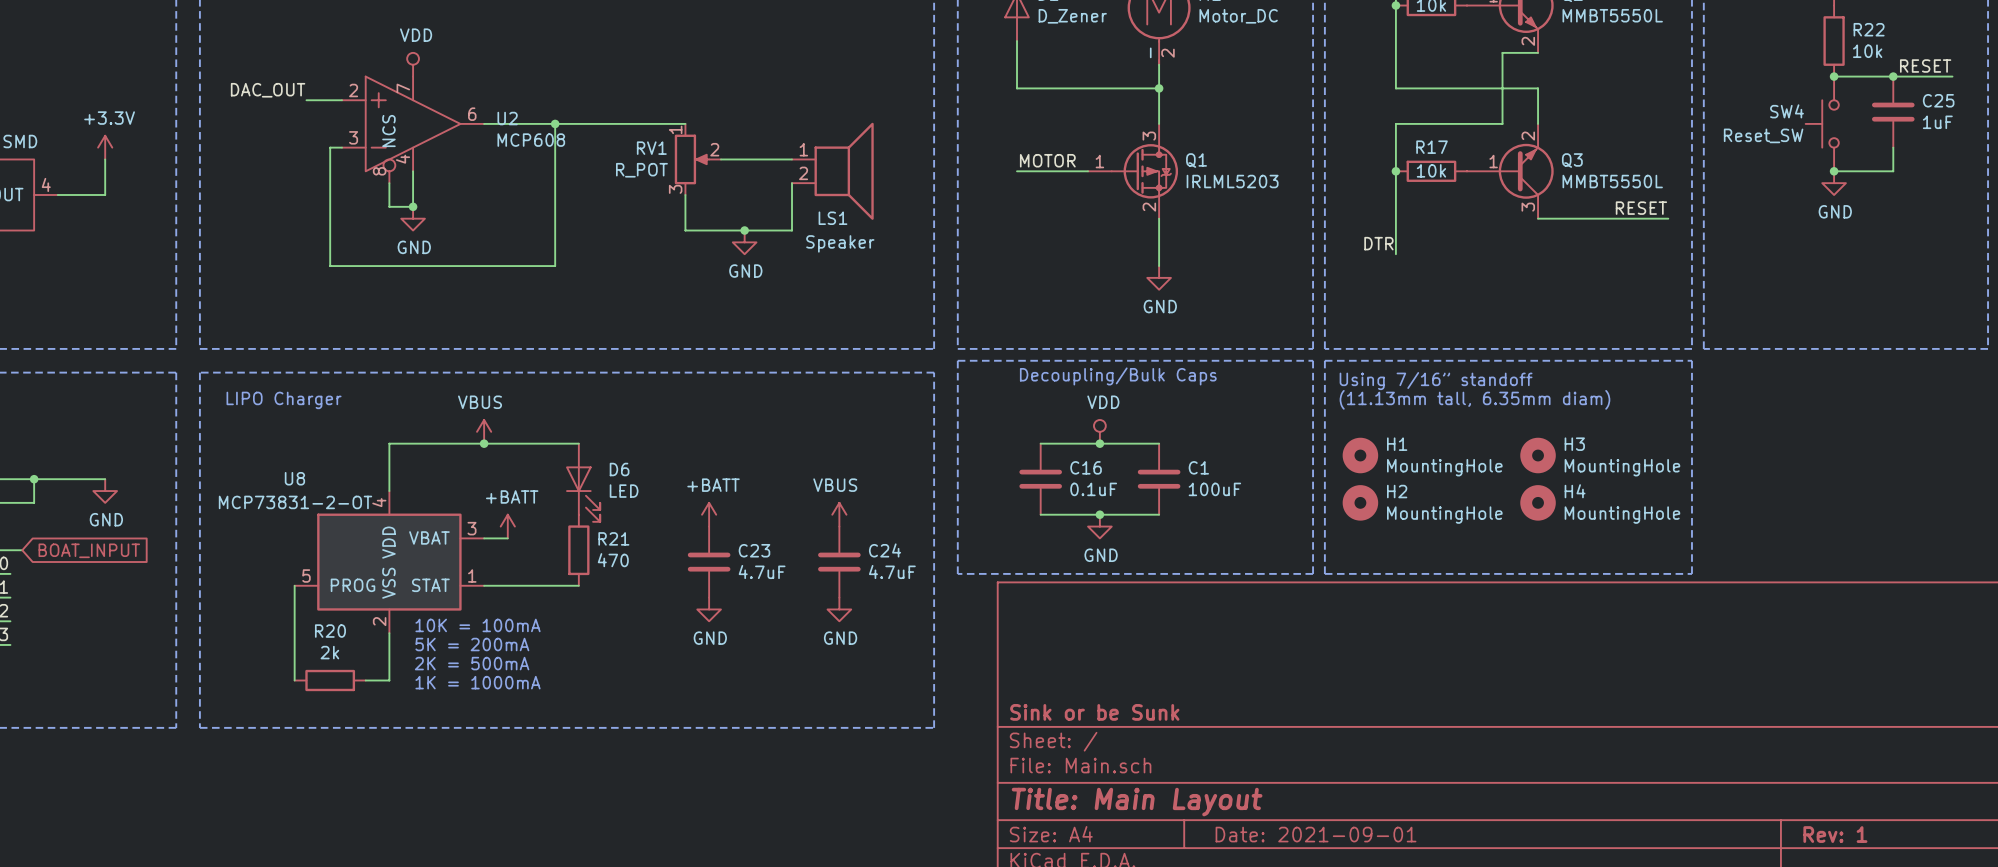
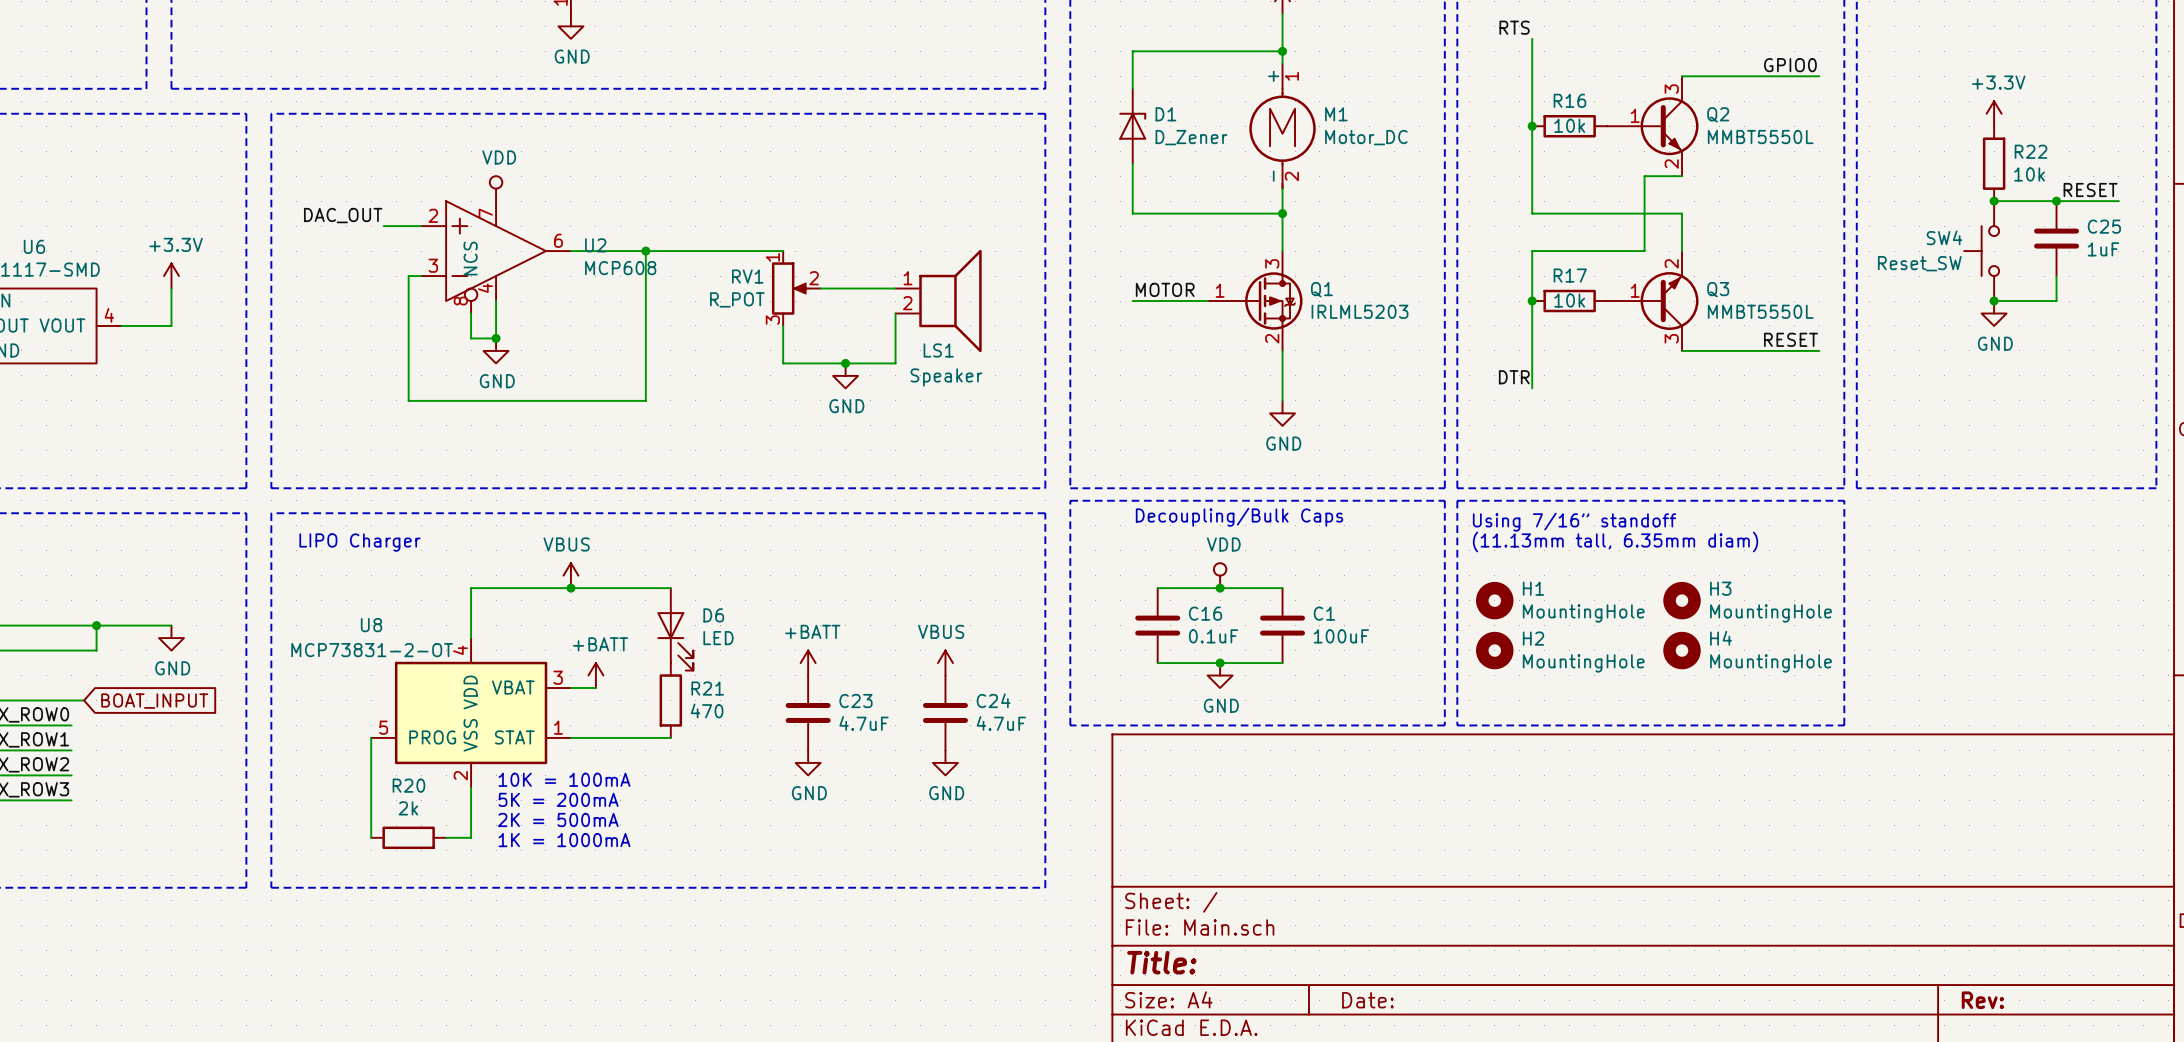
title block: Sink or be Sunk (1094, 712) -> none
title block: Title: Main Layout (1137, 802) -> Title: (1161, 962)
title block: Date: 2021-09-01 (1316, 834) -> Date: (1367, 1000)
title block: Rev: 1 (1835, 834) -> Rev: (1982, 1000)

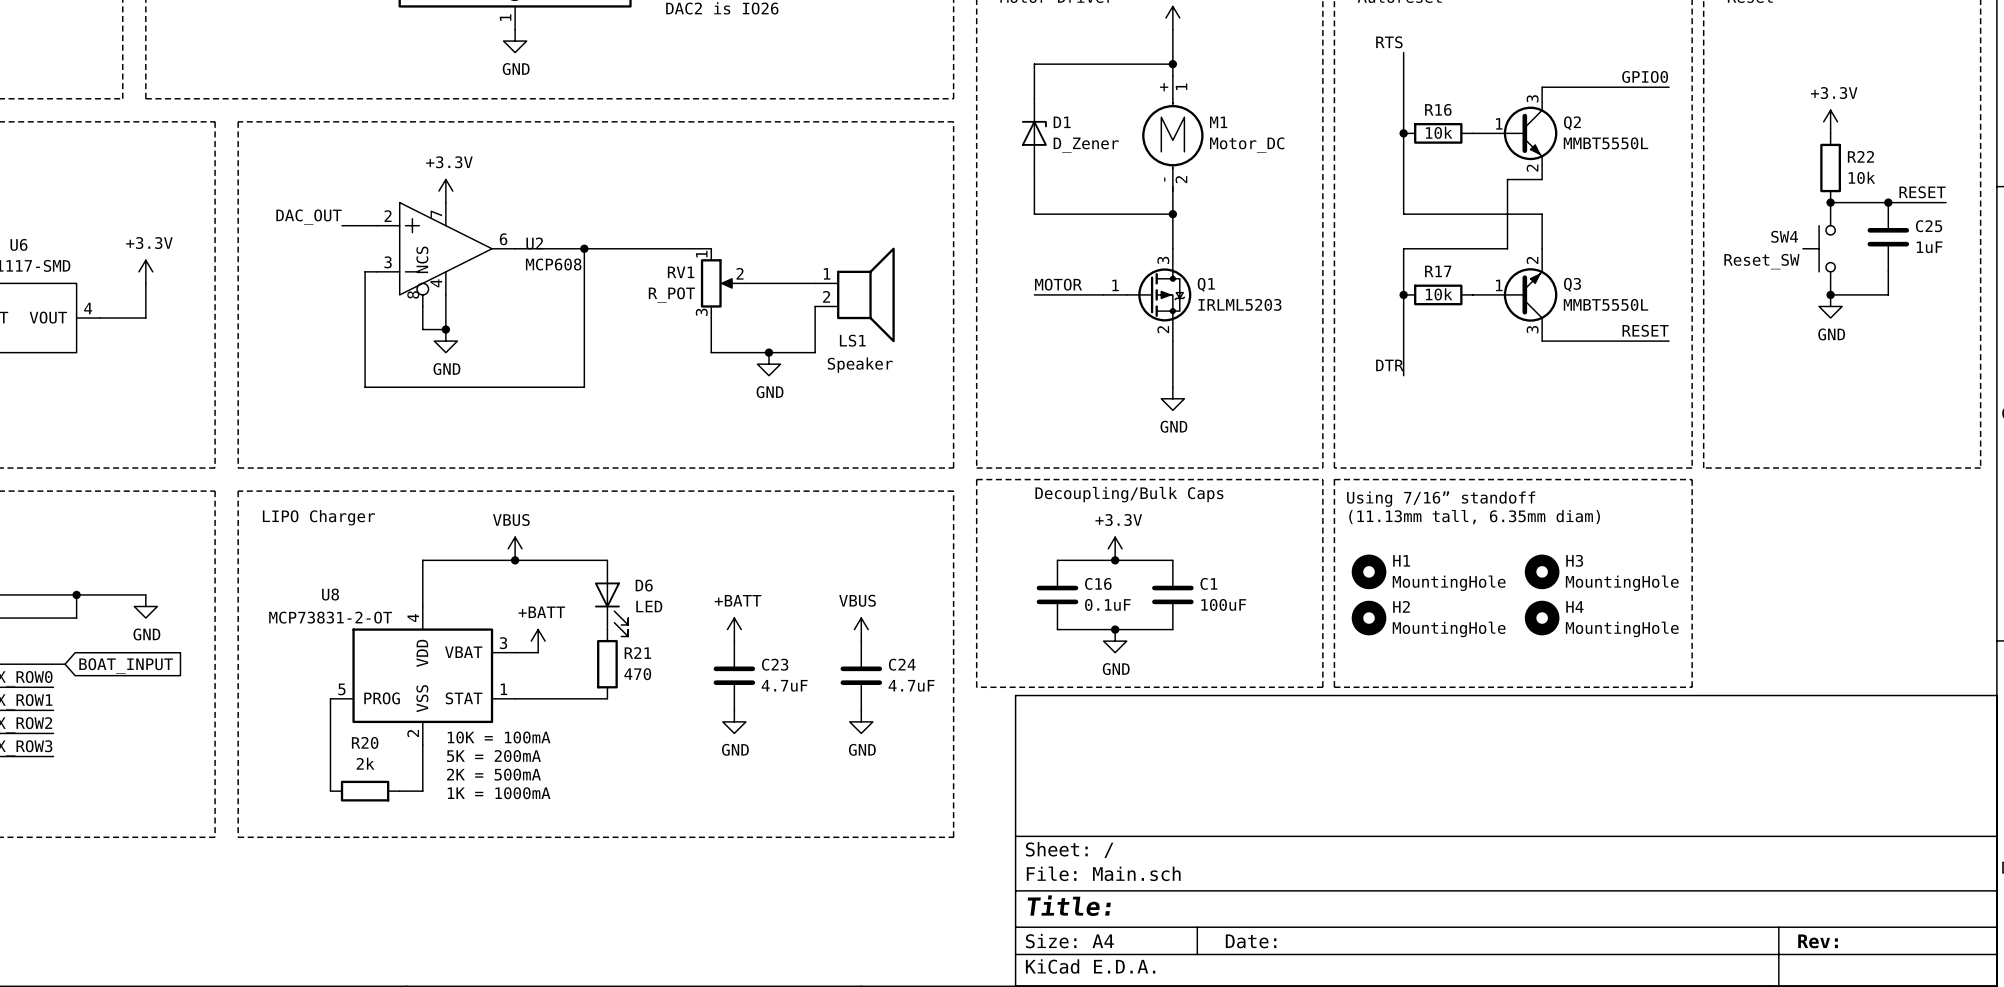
power symbol: VDD (496, 188) -> +3.3V (445, 191)
power symbol: VDD (1220, 575) -> +3.3V (1115, 548)

